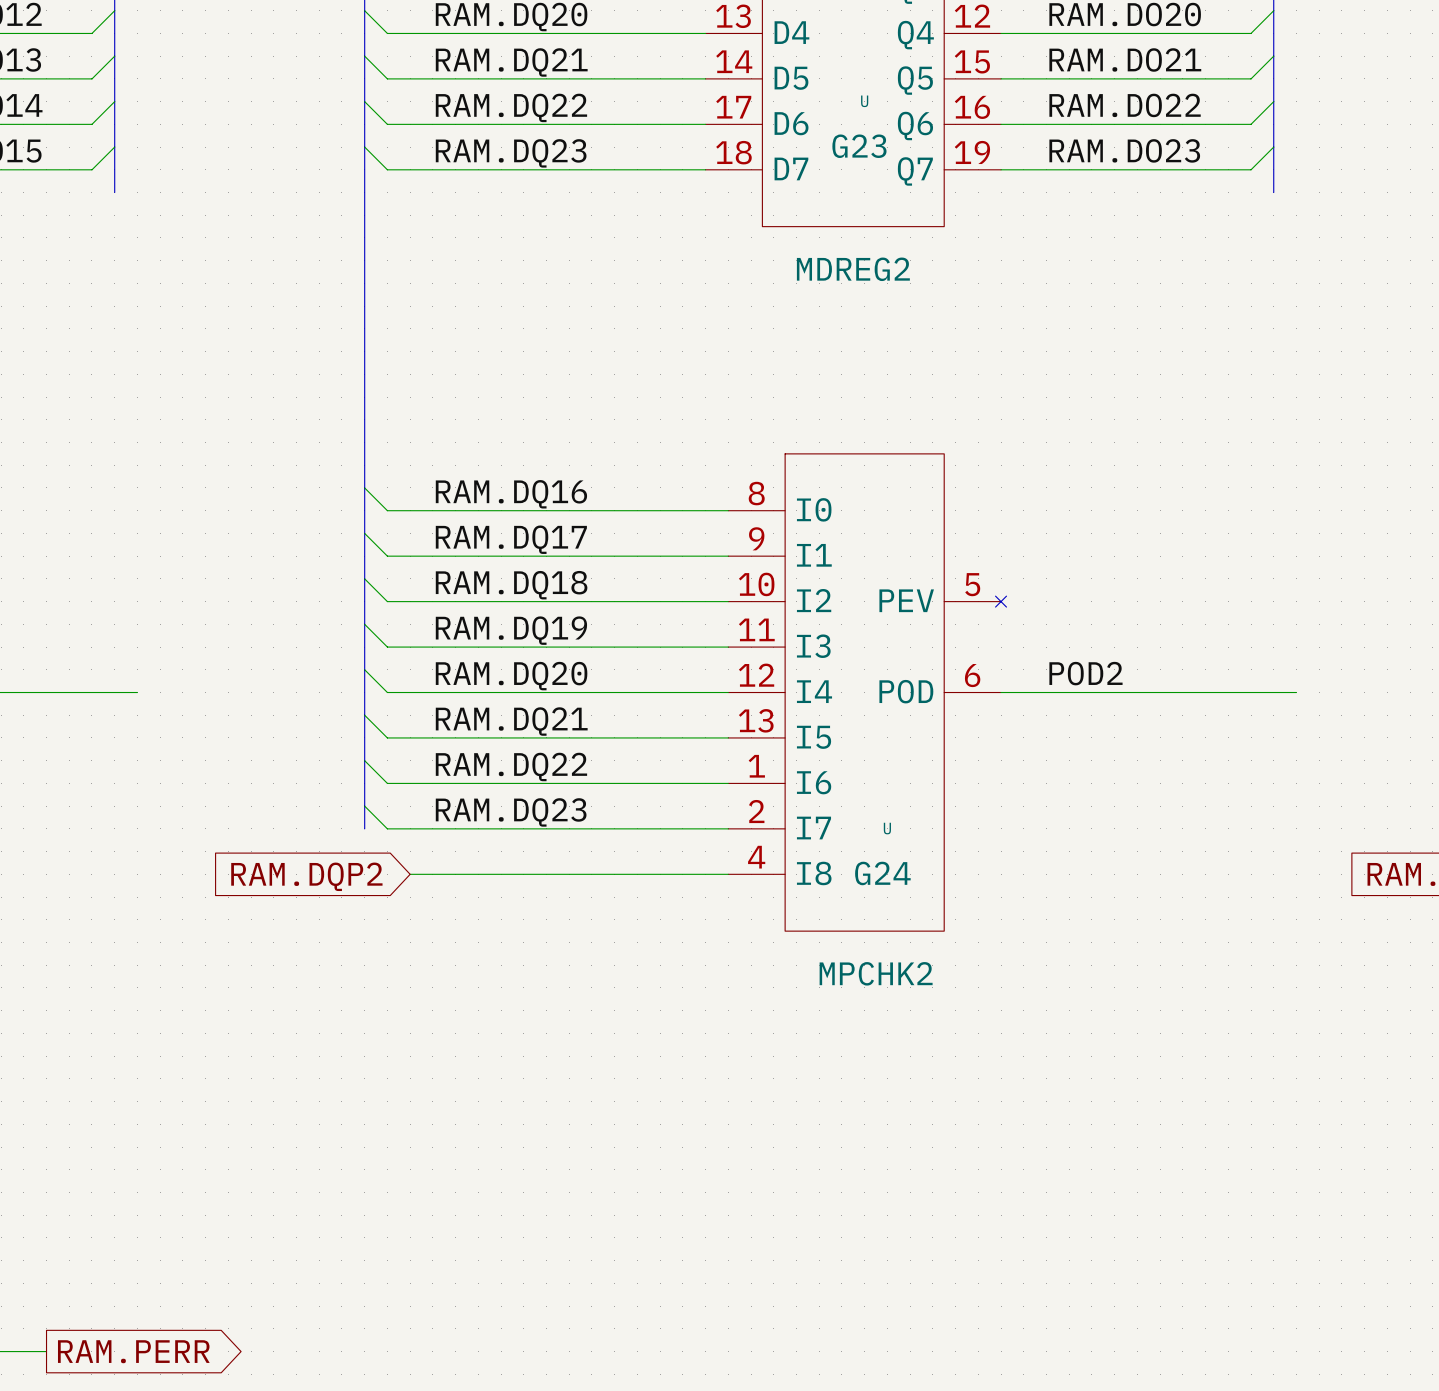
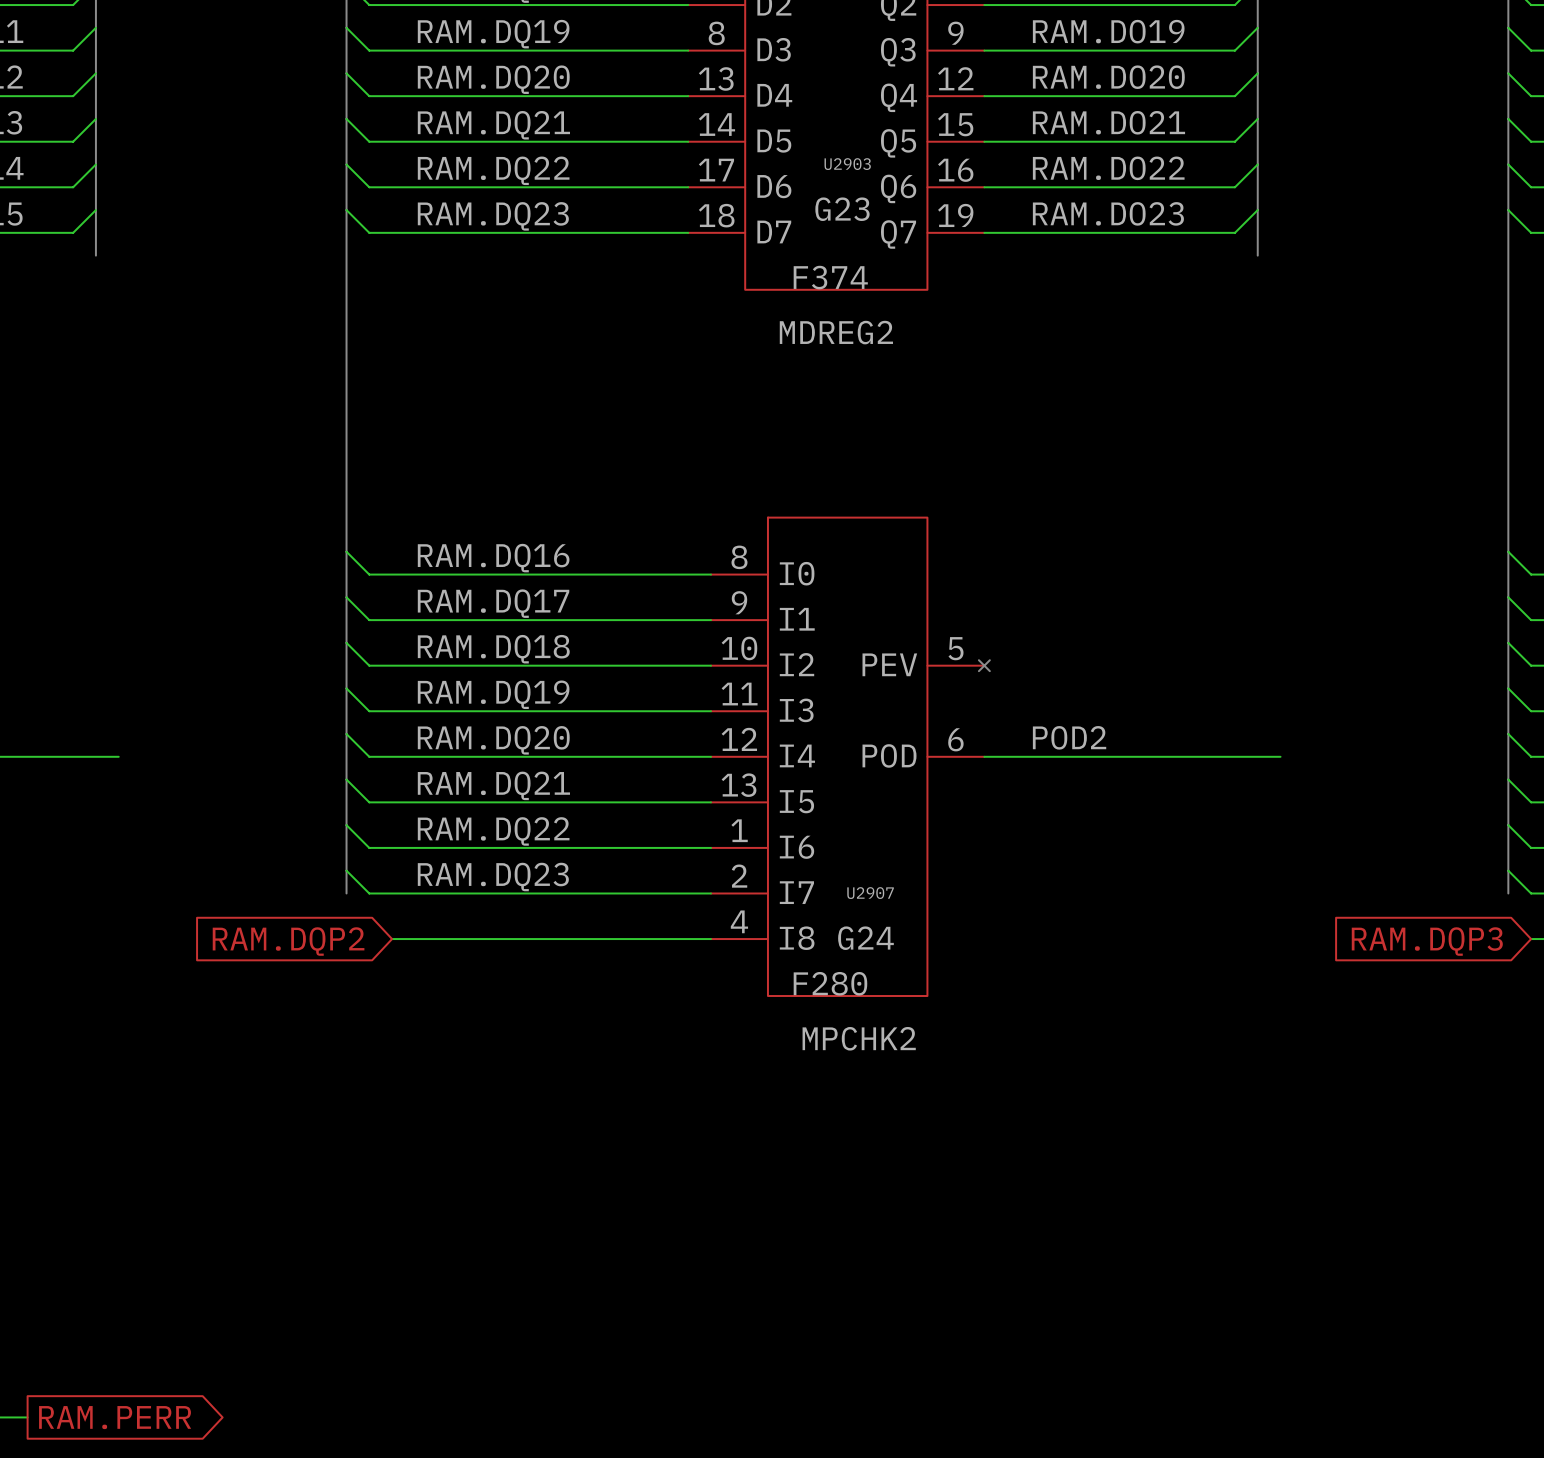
U name: U (864, 101) -> U2903 (847, 164)
U value: none -> F374 (830, 277)
U name: U (887, 828) -> U2907 (870, 893)
U value: none -> F280 (830, 983)

